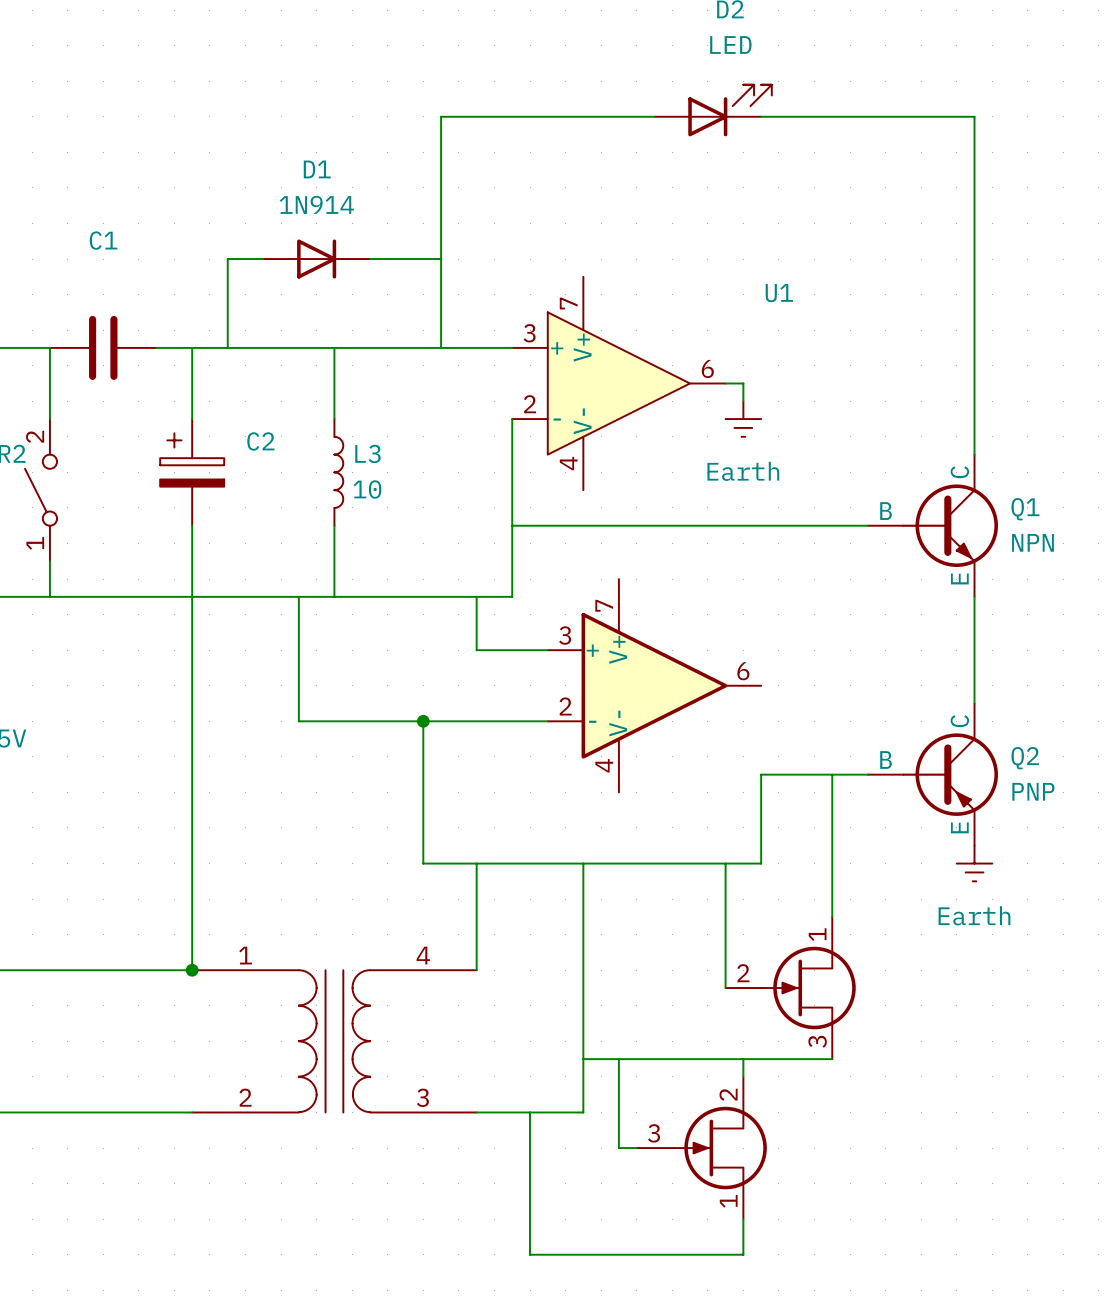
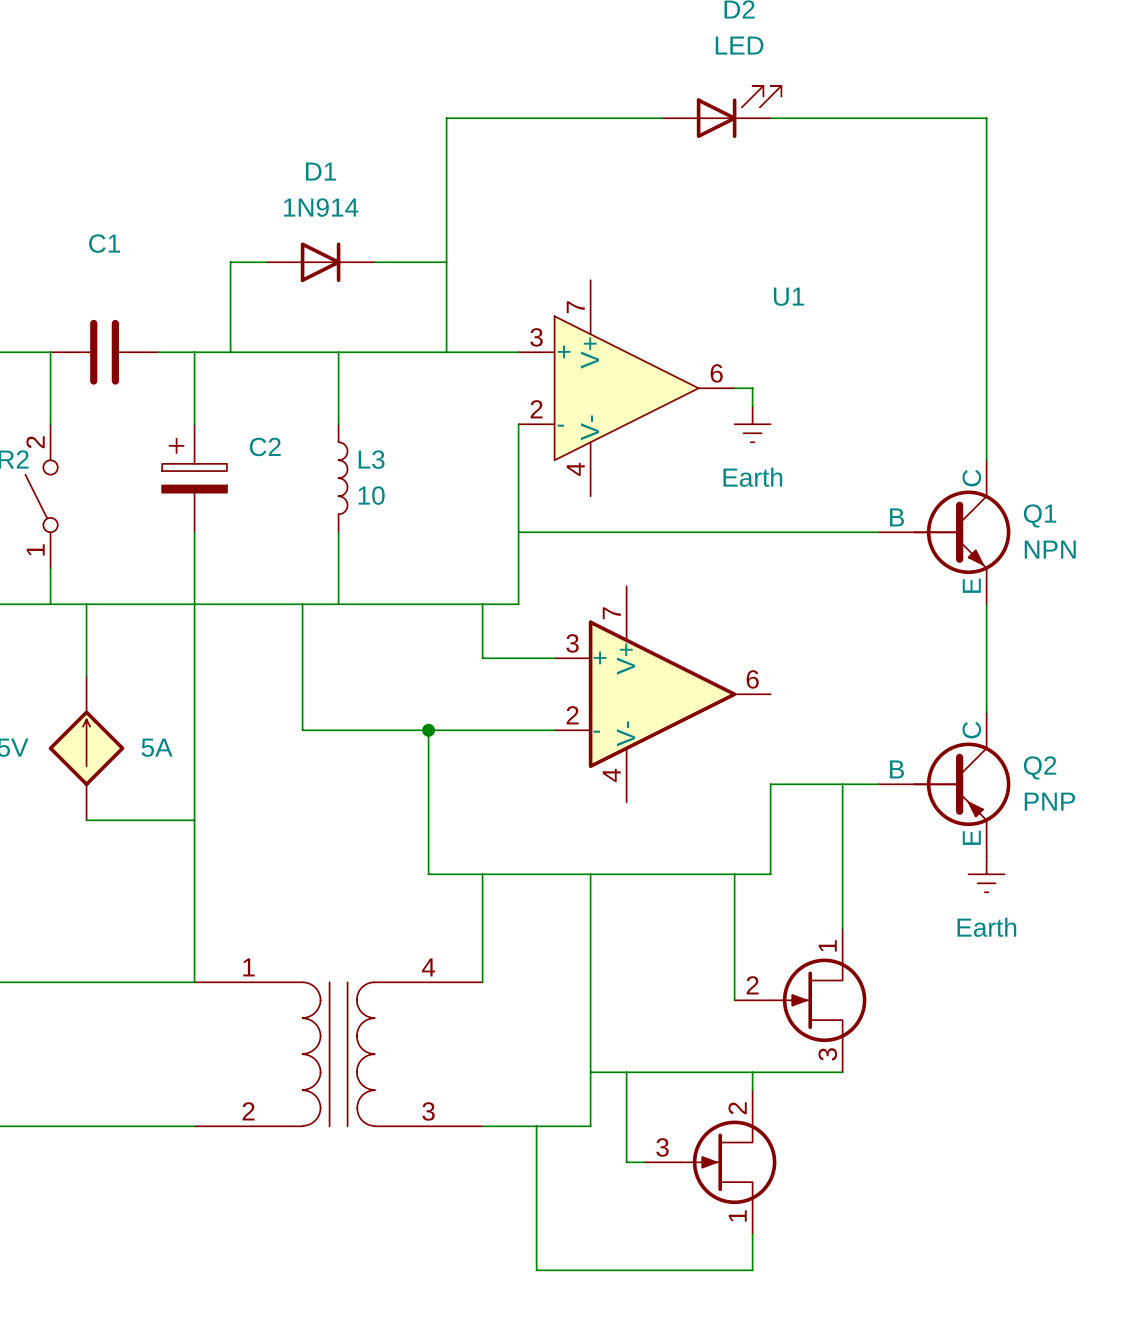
wire: none -> (86, 604) (86, 676)
part: none -> 5A (86, 748)
wire: none -> (86, 820) (194, 820)
junction: (192, 970) -> none

